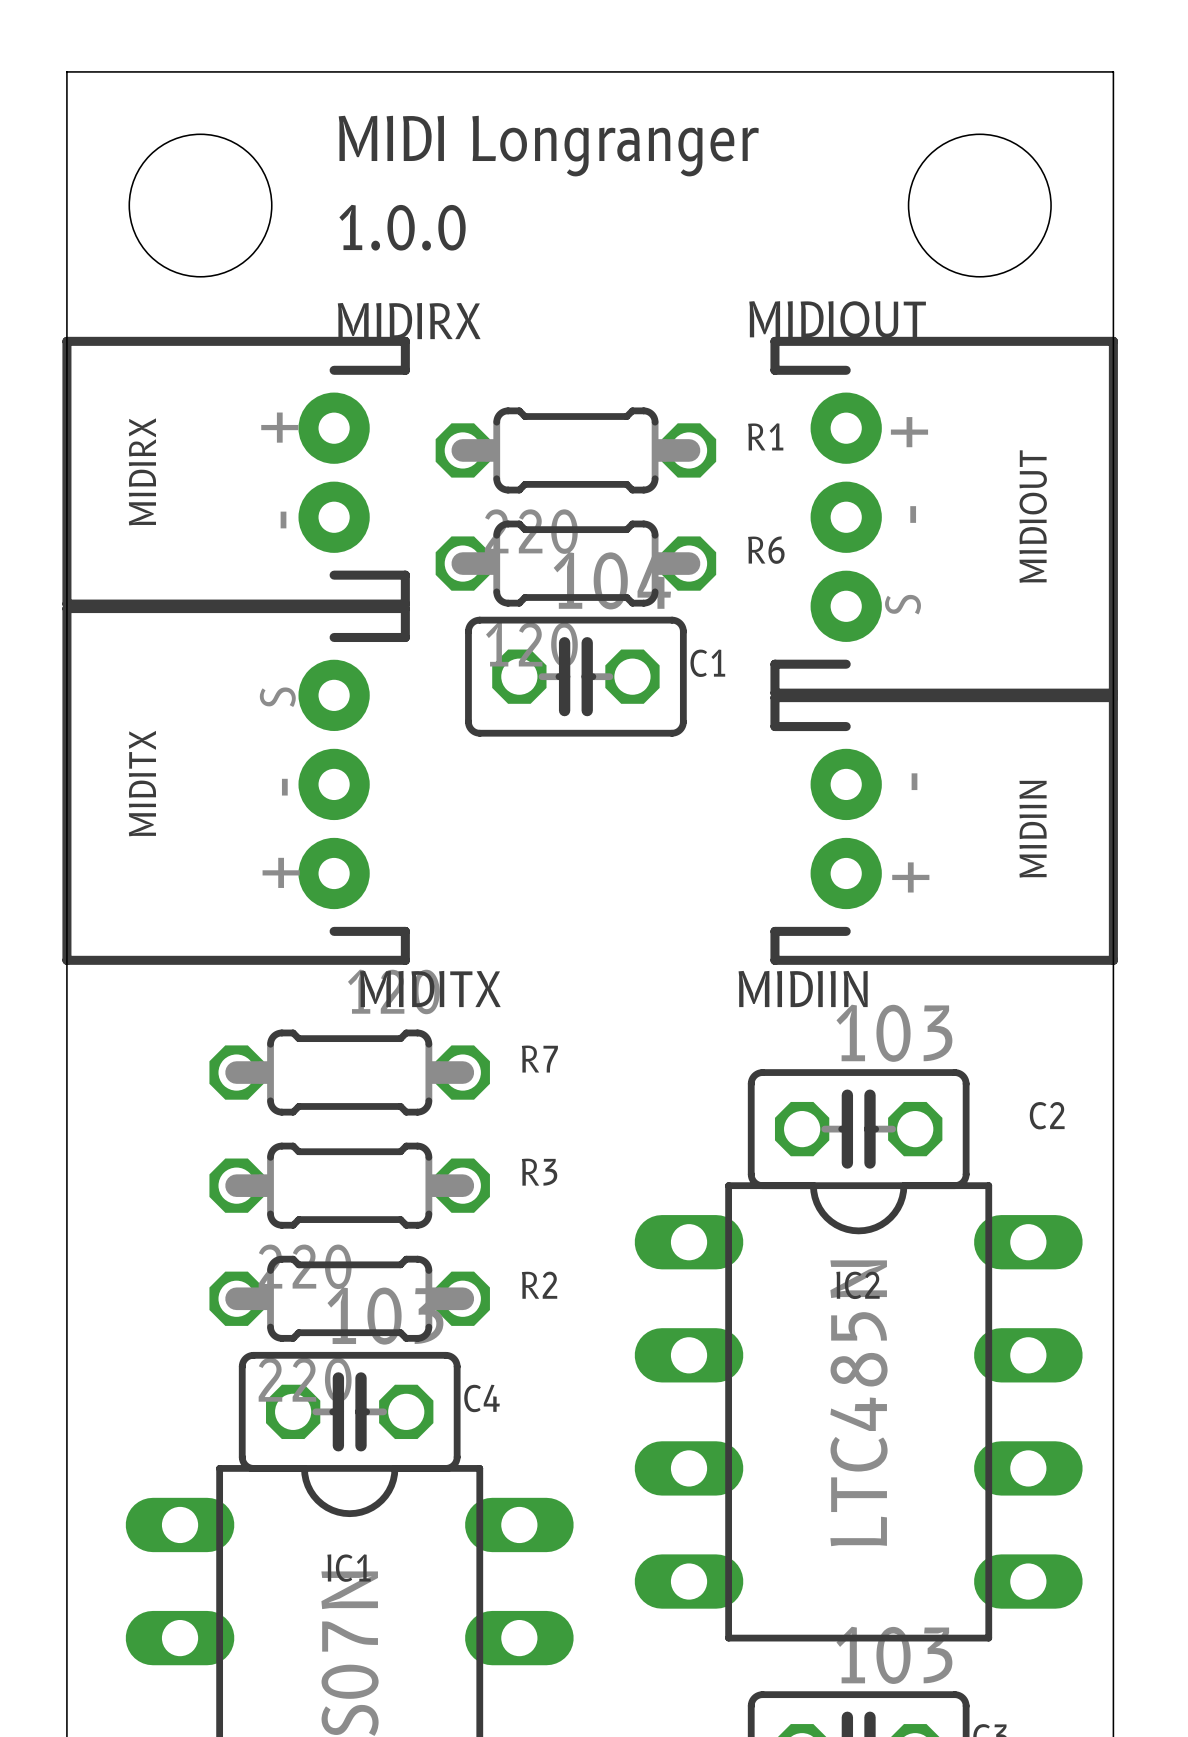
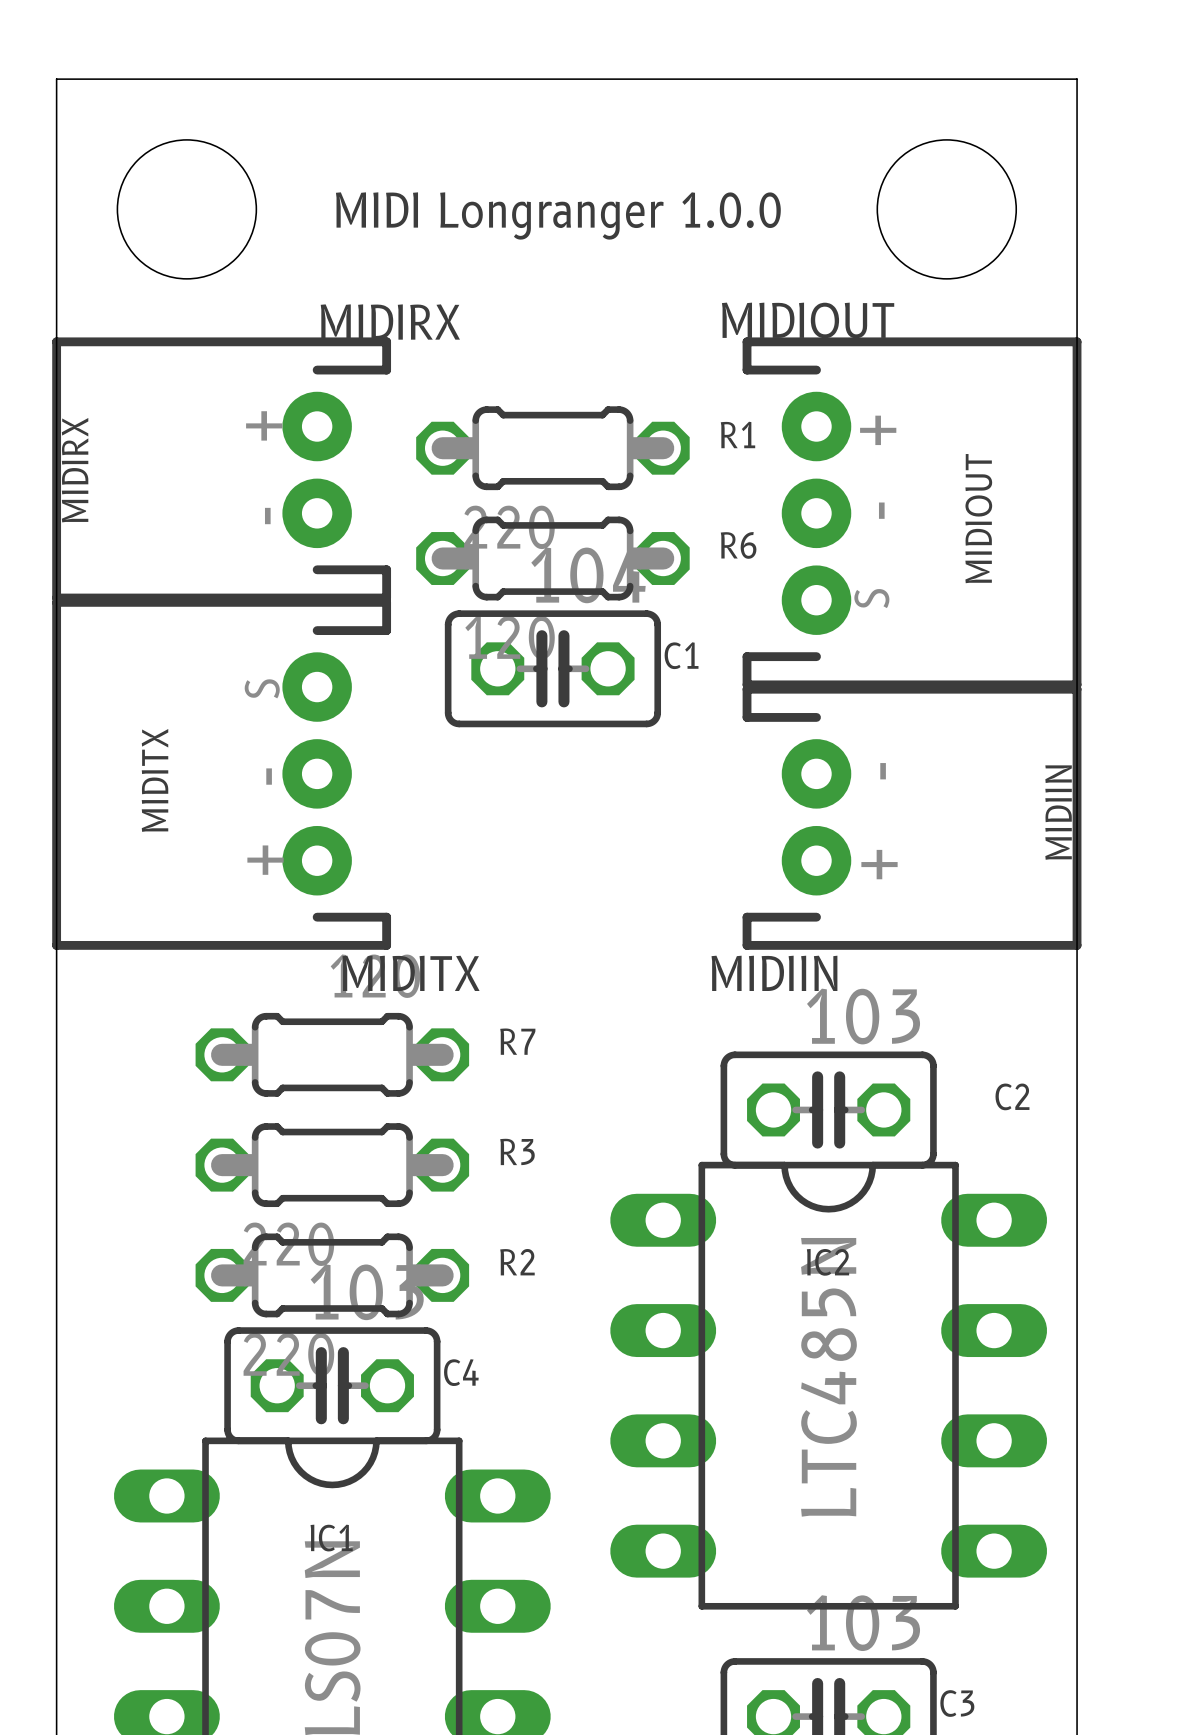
text: MIDI Longranger (548, 146) -> none
text: 1.0.0 (402, 227) -> MIDI Longranger 1.0.0 (558, 215)
MIDIRX name position: MIDIRX (142, 471) -> MIDIRX (75, 470)
MIDIOUT name position: MIDIOUT (1033, 516) -> MIDIOUT (978, 518)
MIDITX name position: MIDITX (142, 783) -> MIDITX (155, 780)
MIDIIN name position: MIDIIN (1033, 829) -> MIDIIN (1058, 812)

